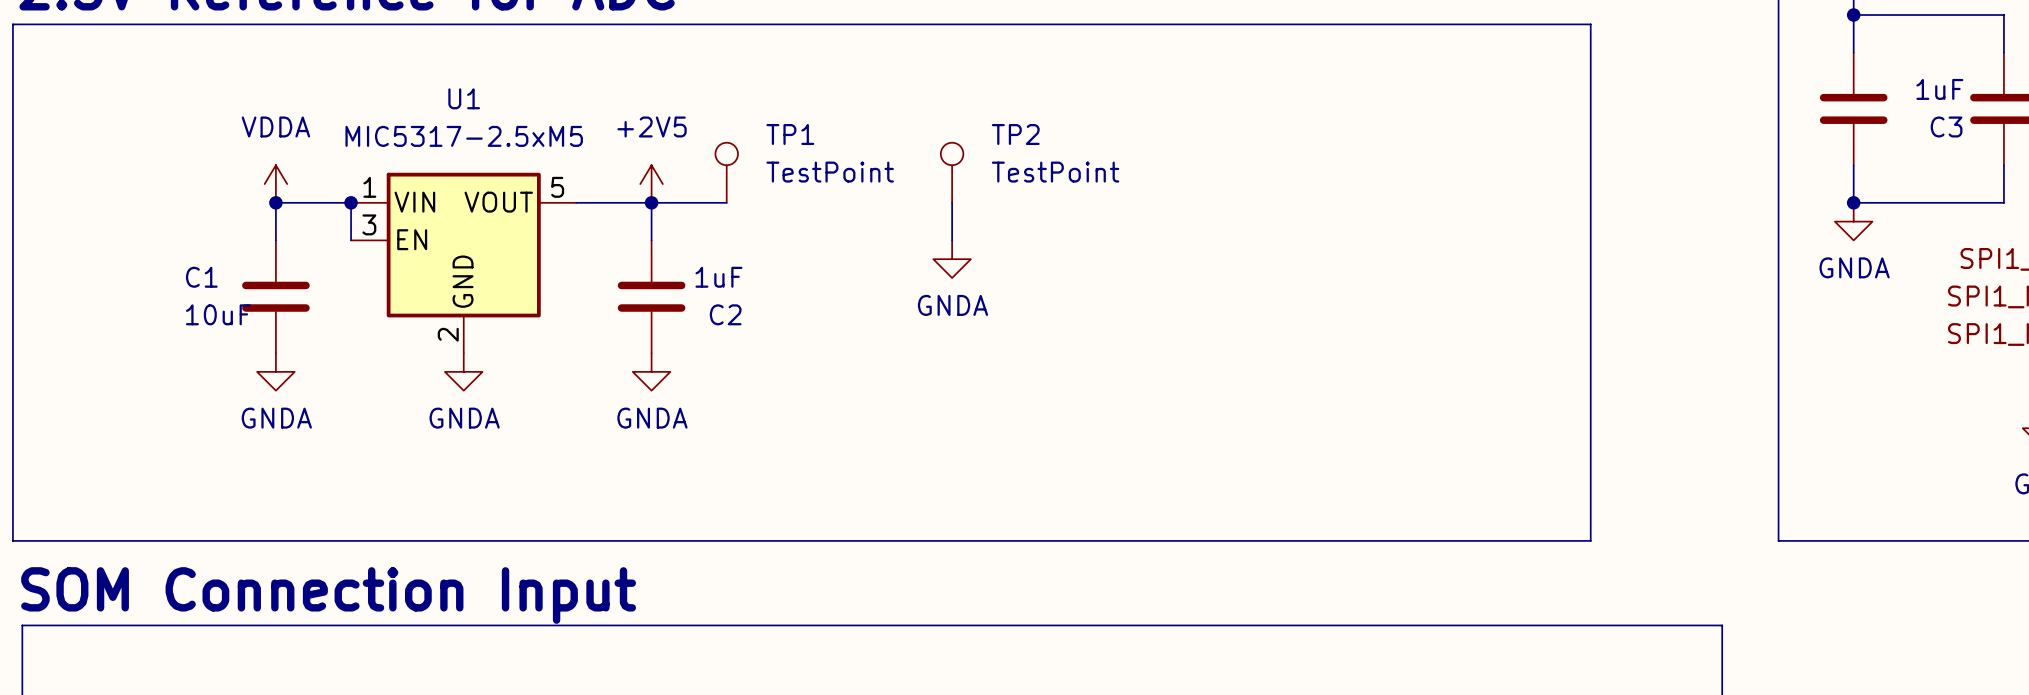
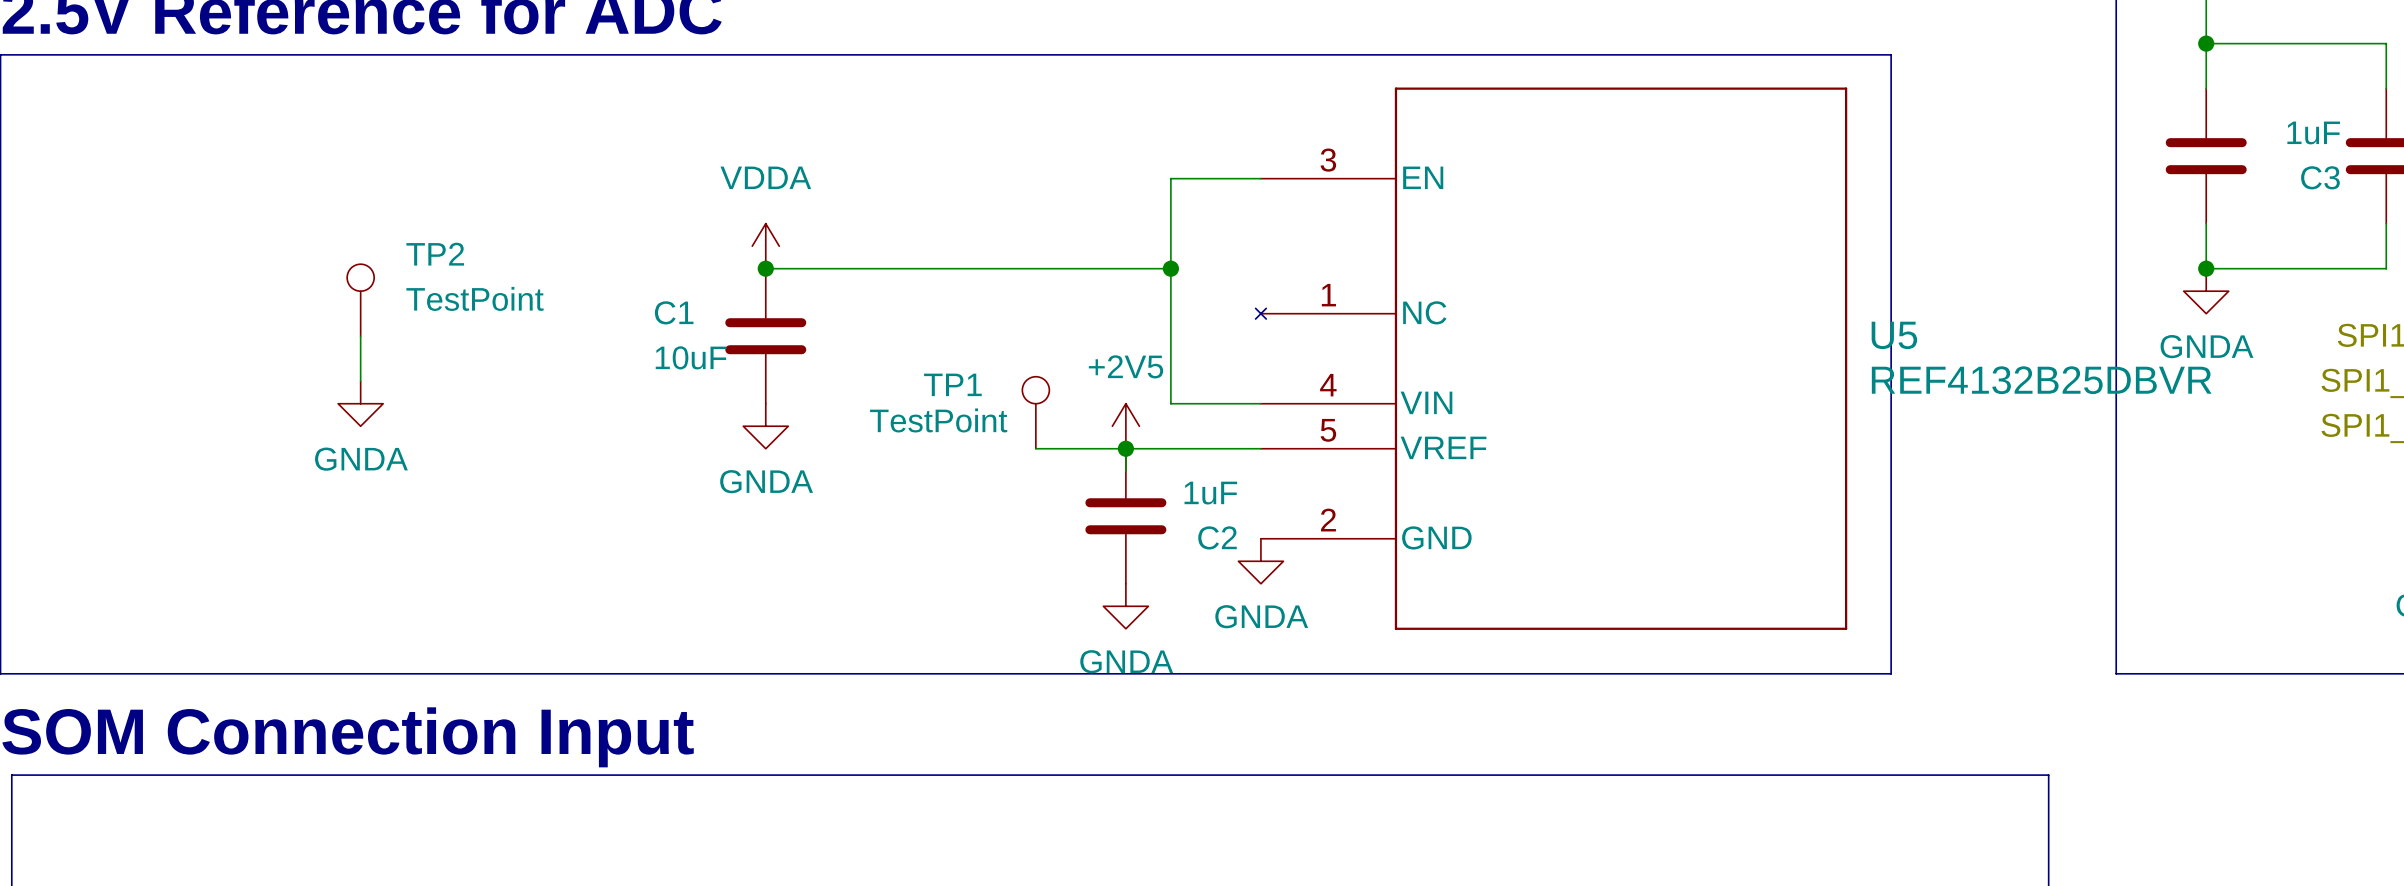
wire: none -> (1260, 178) (1170, 178) (1170, 403) (1260, 403)
TP1 name position: TP1 (790, 134) -> TP1 (952, 384)
TP1 position: (726, 172) -> (1035, 412)
TP1 value position: TestPoint (830, 172) -> TestPoint (938, 420)
TP2 position: (952, 172) -> (360, 300)
power symbol: VDDA (275, 184) -> none
power symbol: +2V5 (651, 184) -> VDDA (765, 246)
junction: (275, 202) -> none
junction: (351, 202) -> none
wire: (576, 202) (651, 202) (651, 240) -> none
wire: none -> (855, 268) (1170, 268)
wire: (952, 202) (952, 240) -> none
junction: none -> (1170, 268)
wire: (275, 240) (275, 202) (351, 202) (351, 240) -> none
wire: none -> (360, 336) (360, 381)
power symbol: GNDA (952, 259) -> none
U1: MIC5317-2.5xM5 (463, 262) -> none
U5: none -> REF4132B25DBVR (1551, 358)
C1 position: (275, 296) -> (765, 336)
C2 position: (651, 296) -> (1125, 516)
power symbol: none -> +2V5 (1125, 426)
wire: none -> (1035, 448) (1260, 448)
wire: none -> (1125, 448) (1125, 471)
junction: none -> (1125, 448)
power symbol position: GNDA (275, 371) -> GNDA (360, 403)
power symbol: GNDA (463, 371) -> none
power symbol position: GNDA (651, 371) -> GNDA (765, 426)
power symbol: none -> GNDA (1260, 561)
power symbol: none -> GNDA (1125, 606)

